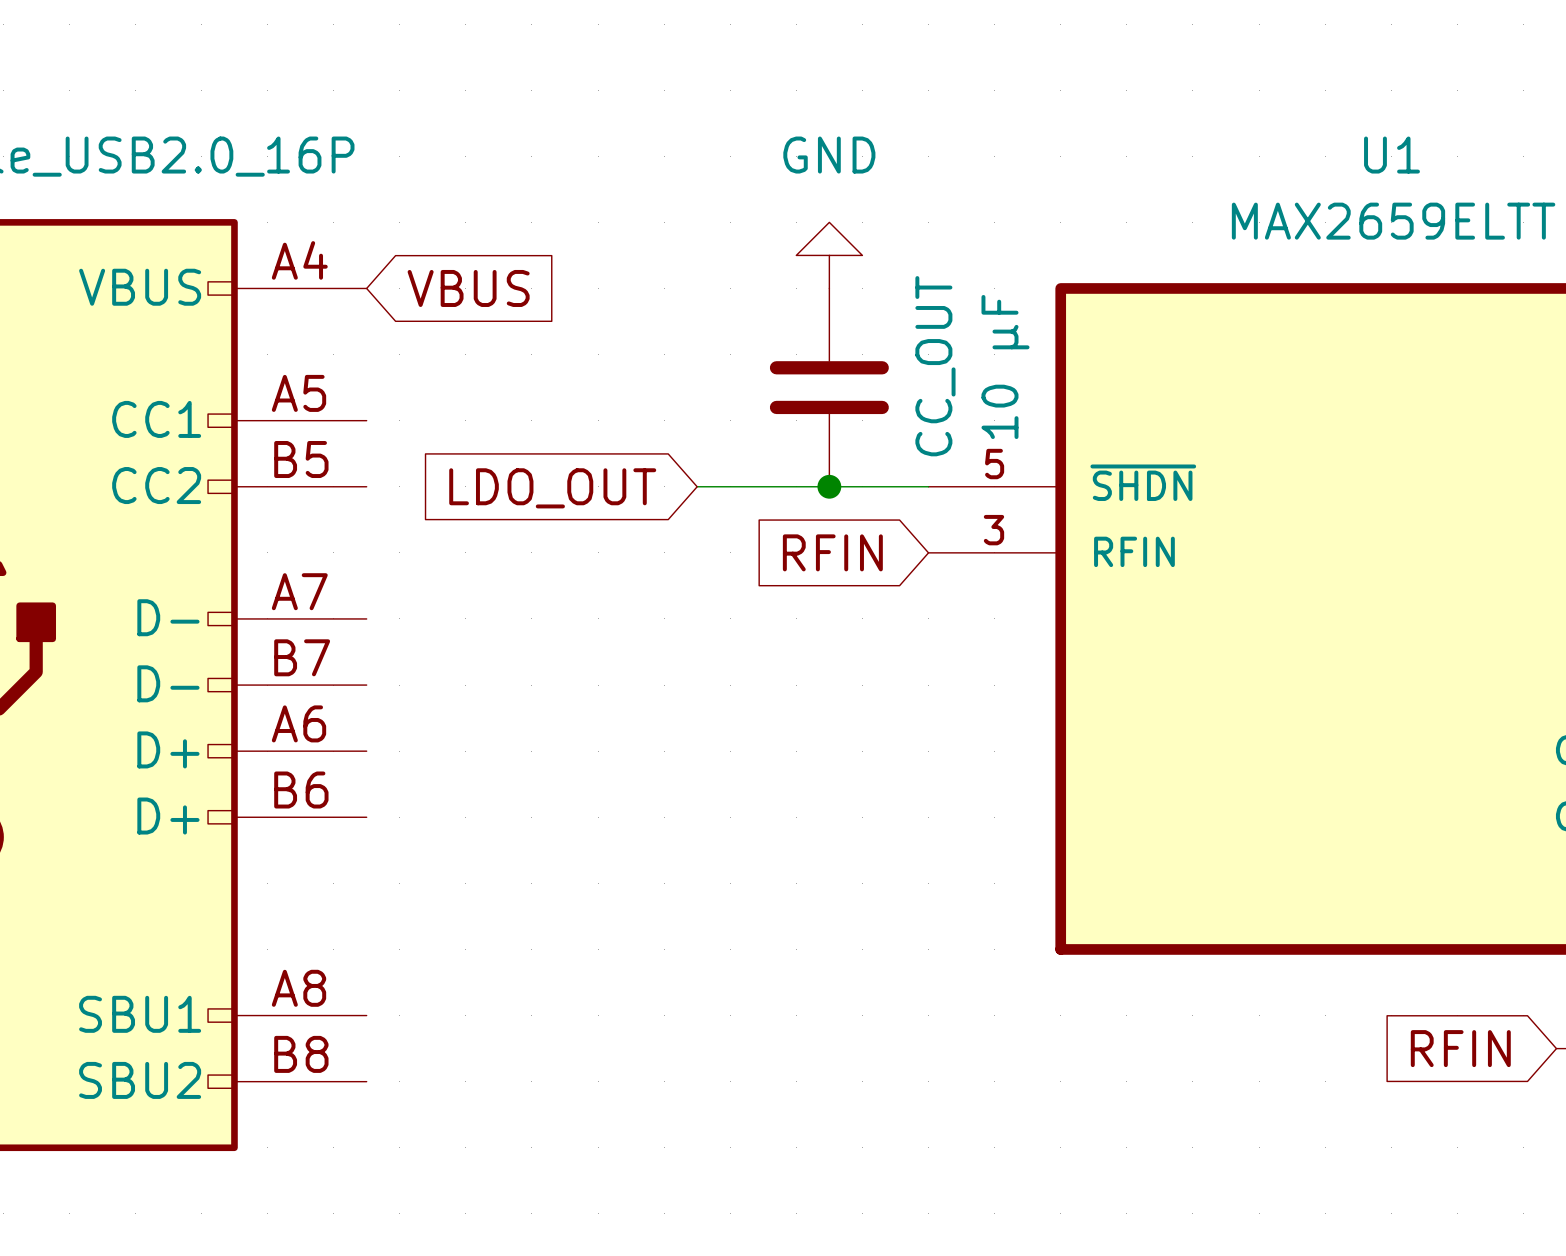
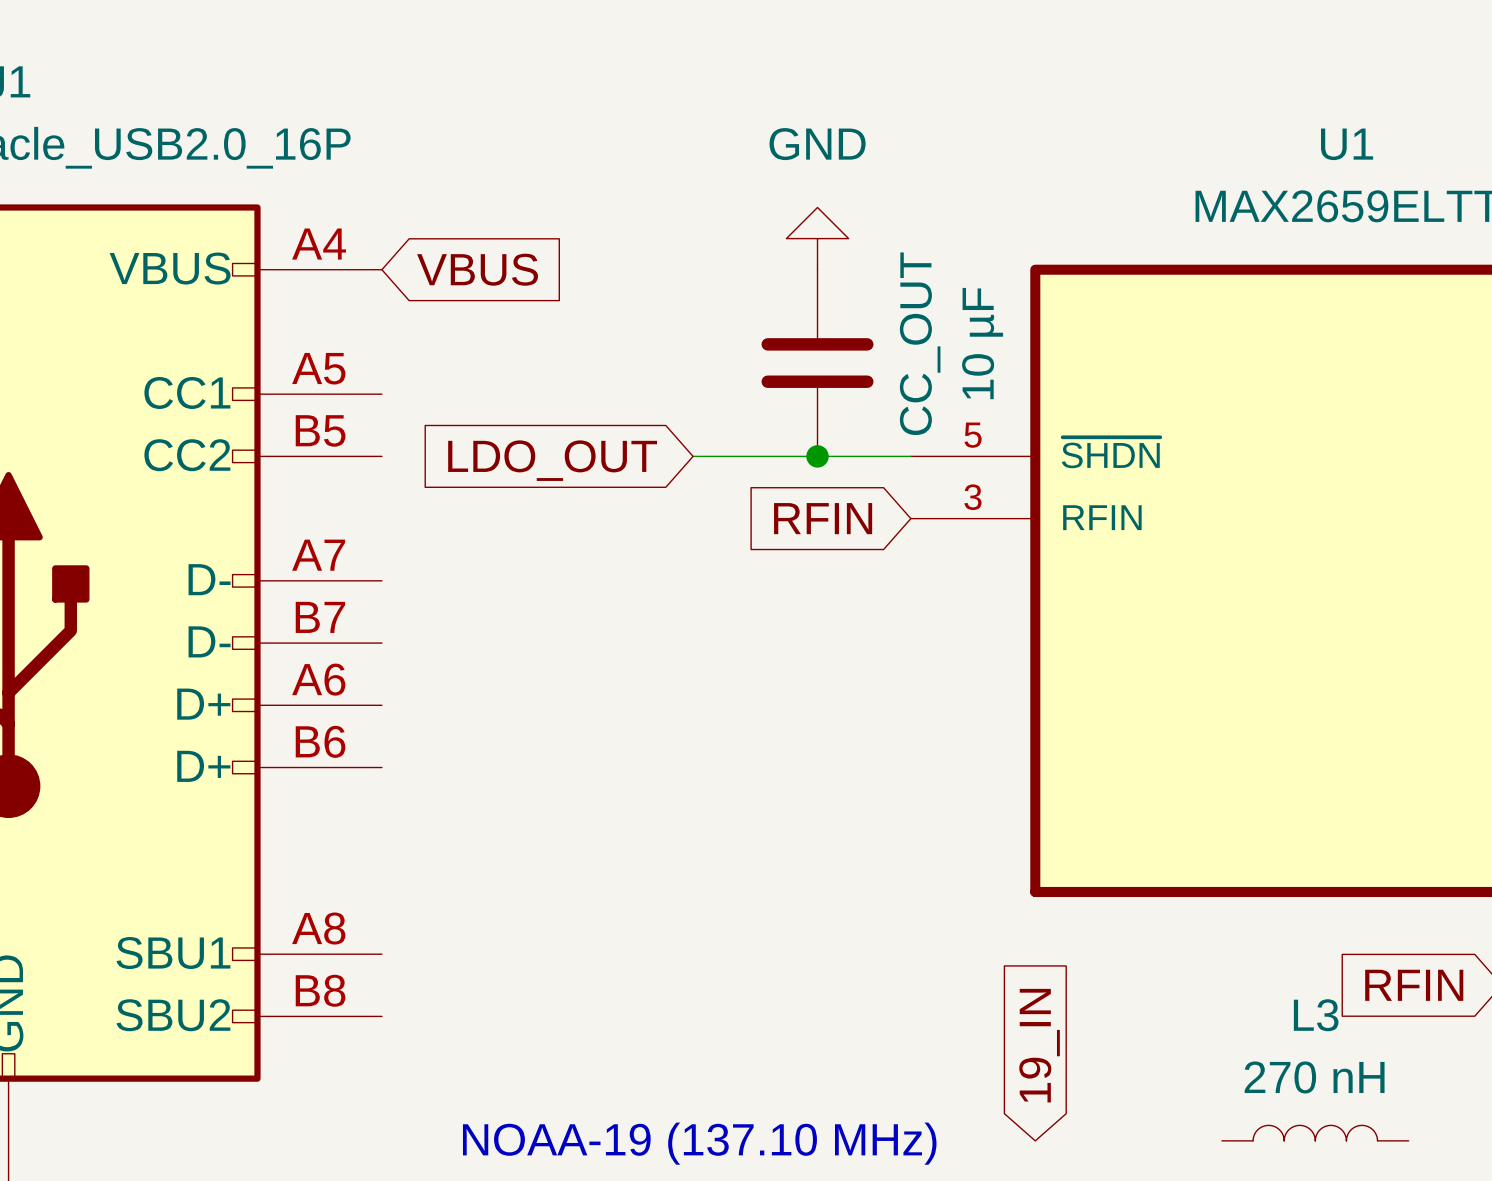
global label: none -> 19_IN (1039, 1045)
L3: none -> 270 nH (1315, 1133)
text: none -> NOAA-19 (137.10 MHz) (699, 1143)

